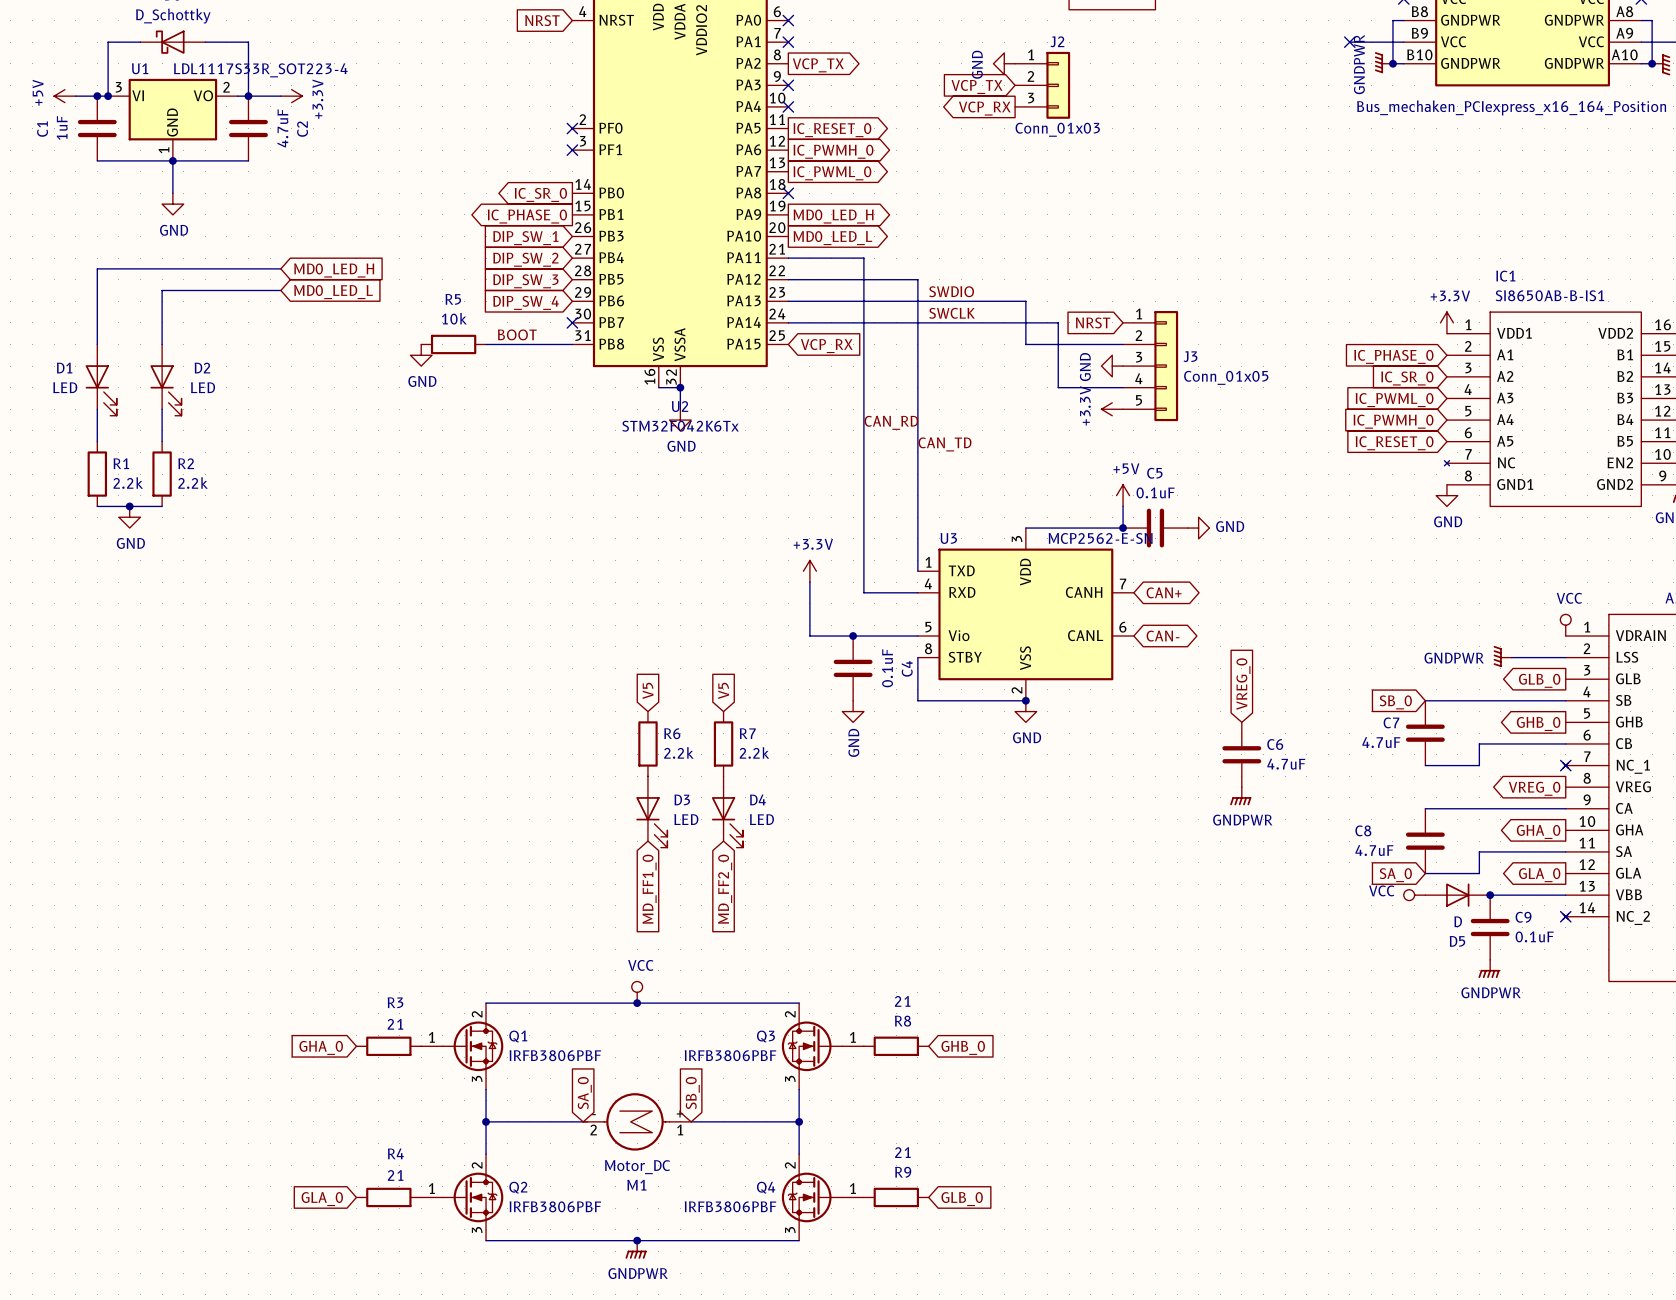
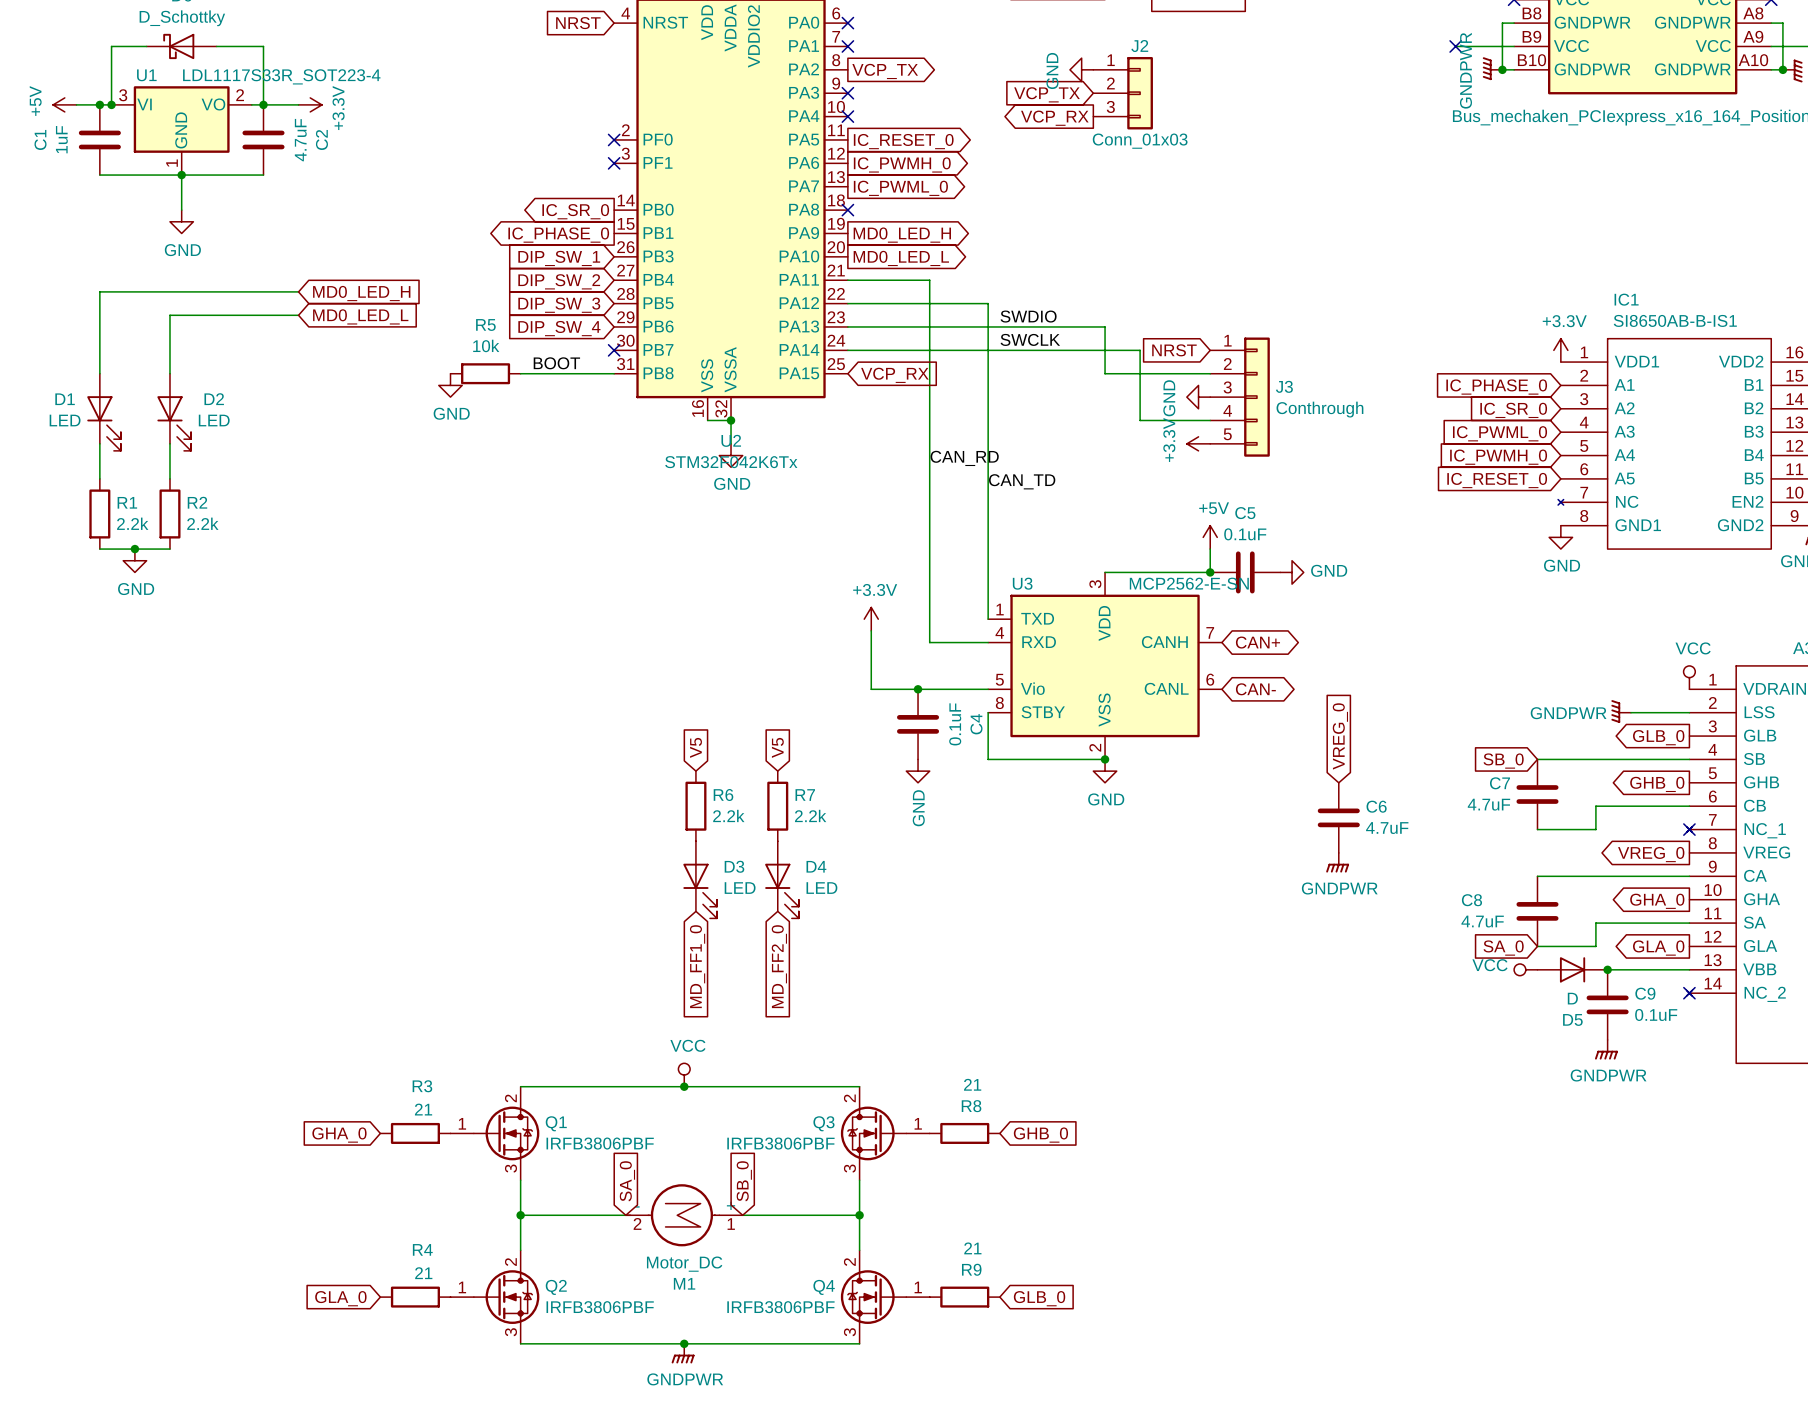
J3 value: Conn_01x05 (1226, 377) -> Conthrough (1319, 409)

